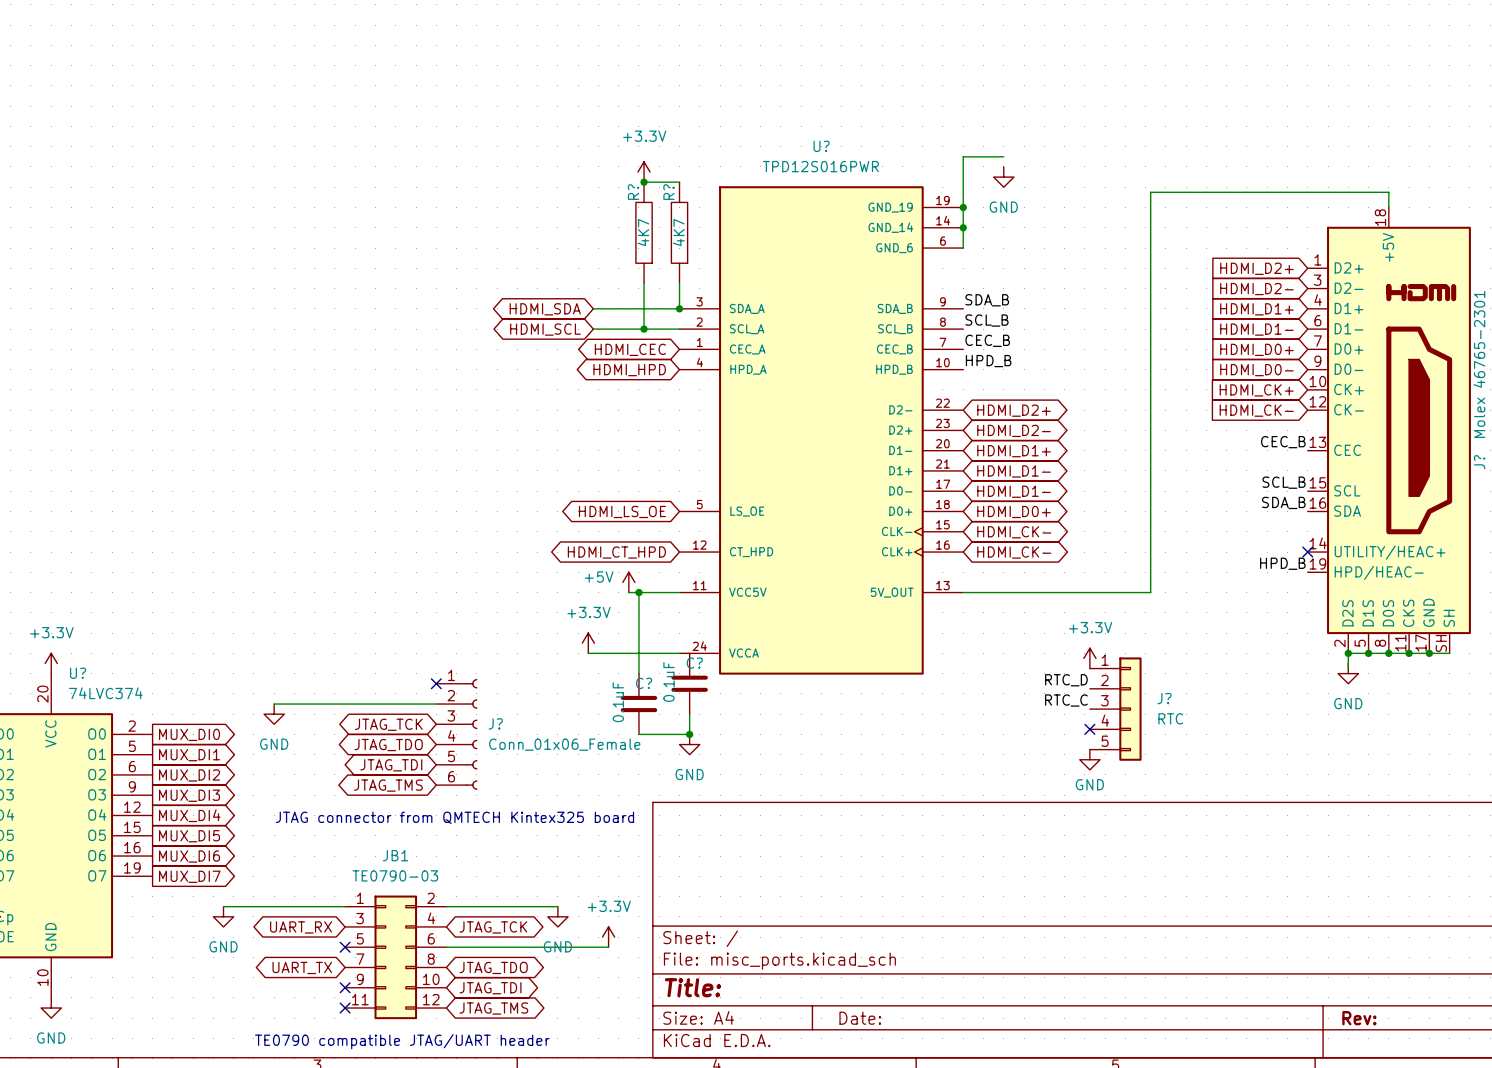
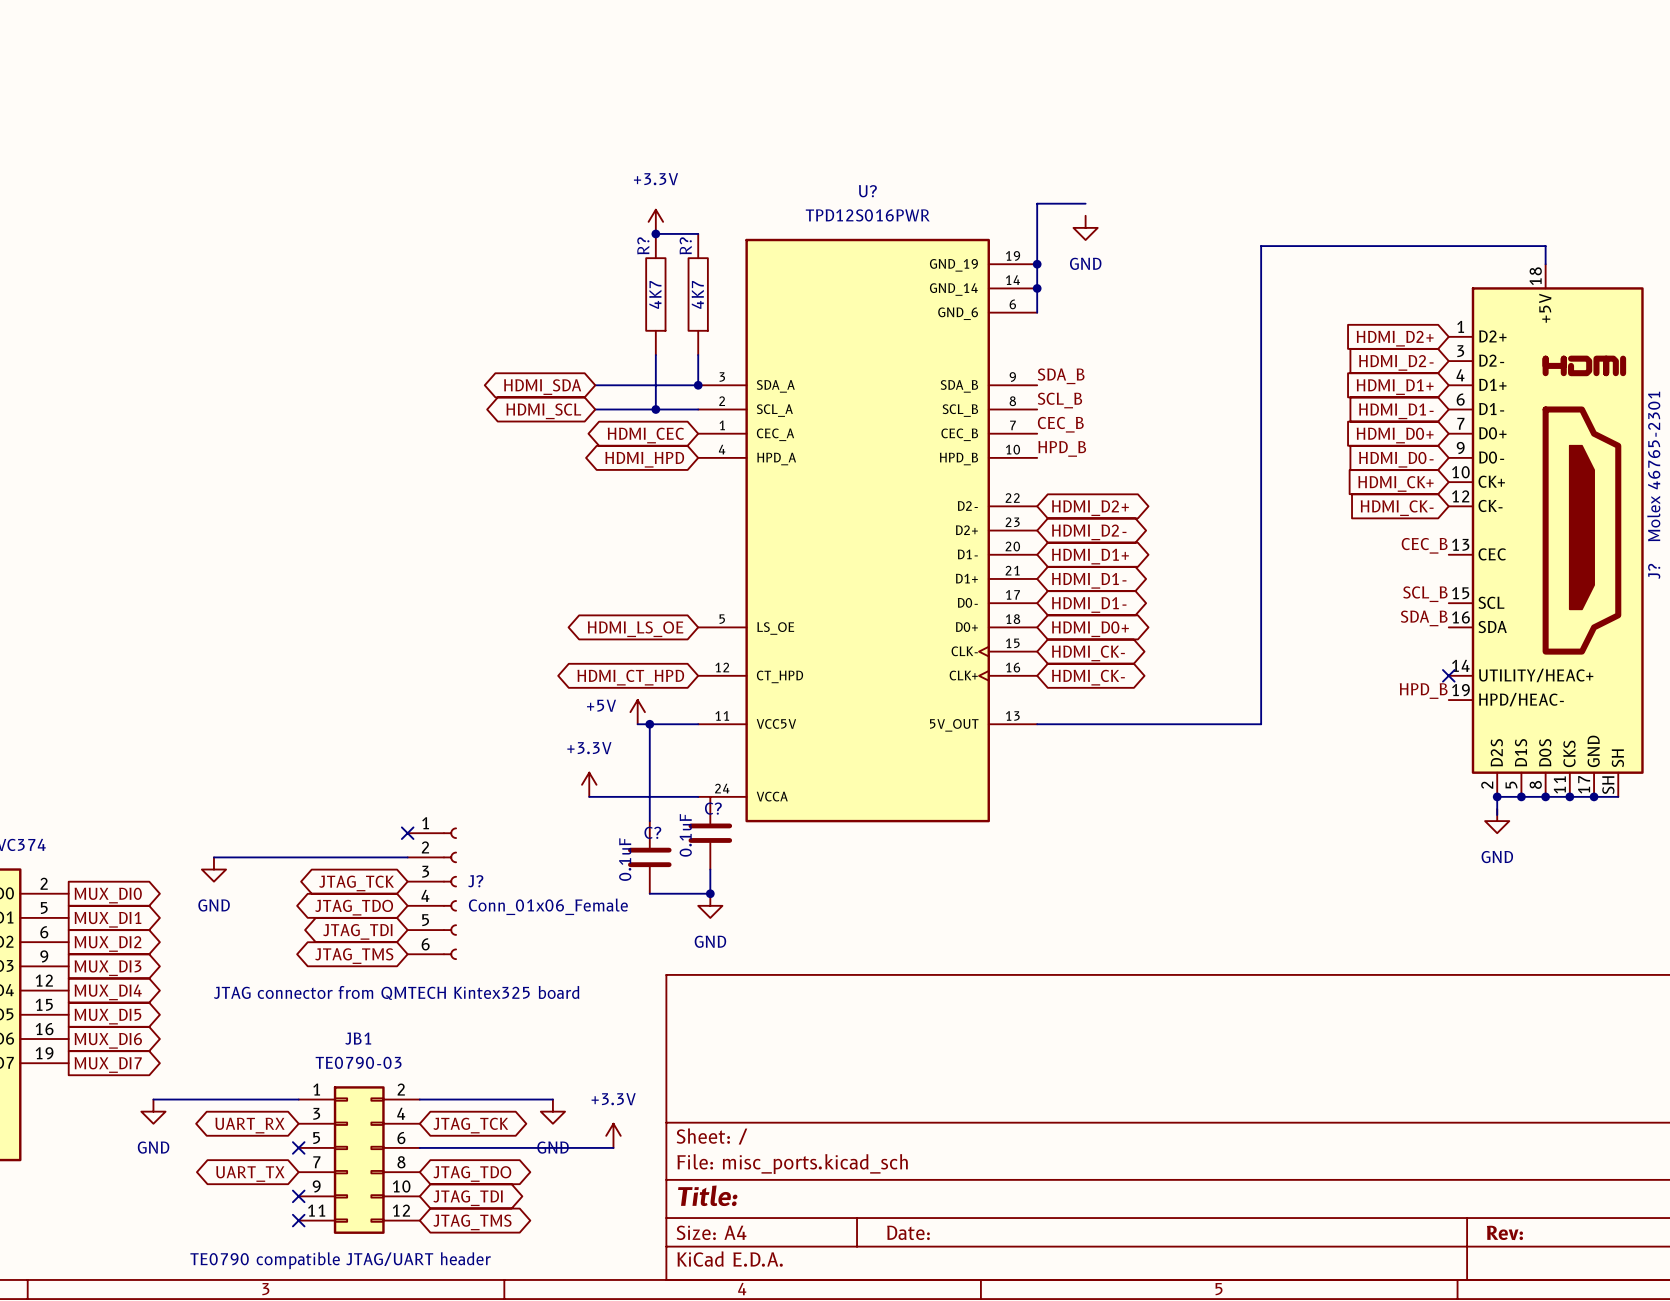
power symbol: +3.3V (1089, 658) -> none
label: RTC_D (1066, 680) -> none
label: RTC_C (1066, 700) -> none
J?: RTC (1115, 709) -> none
no-connect mark: (1089, 729) -> none
power symbol: GND (1089, 759) -> none

